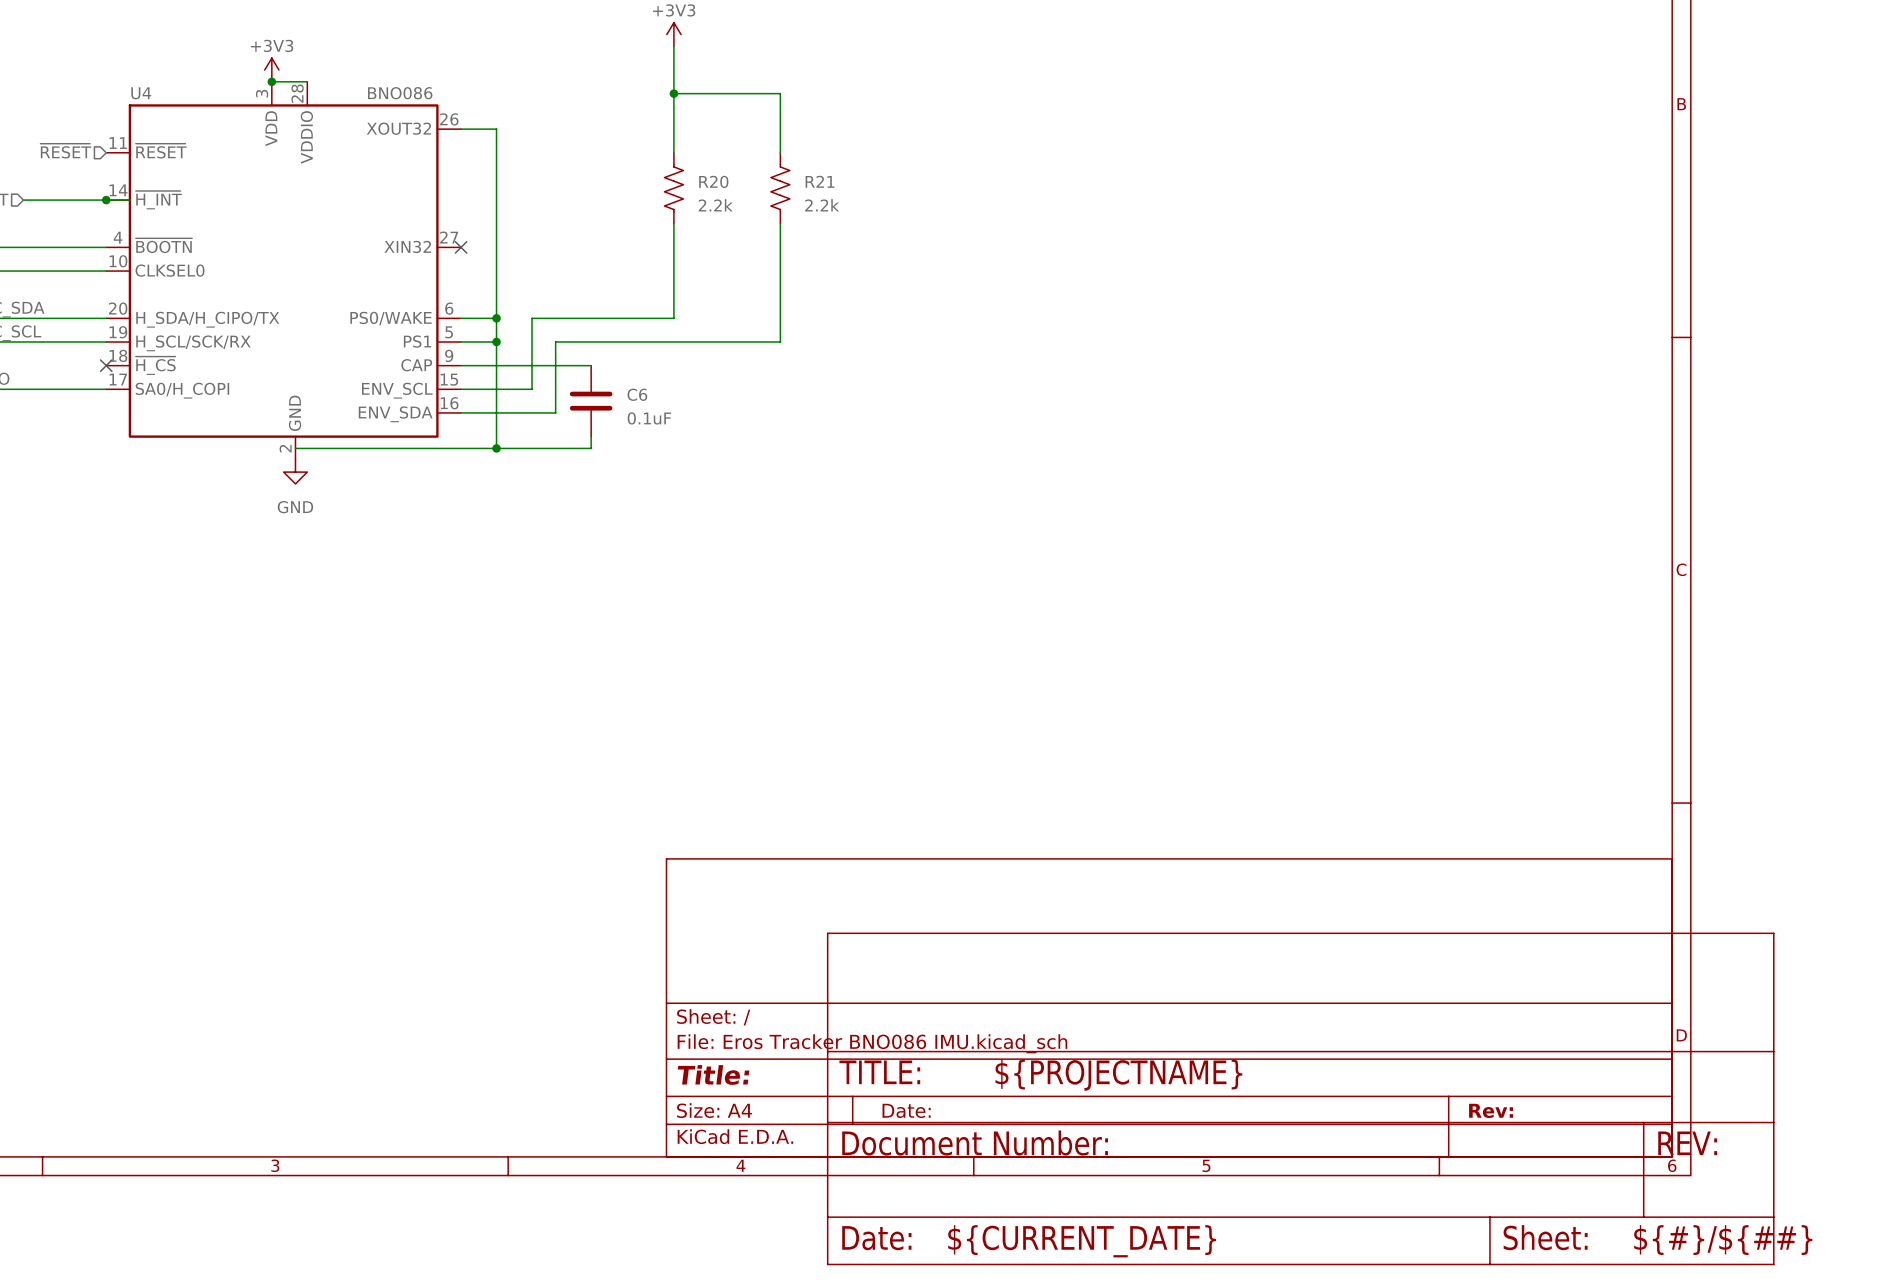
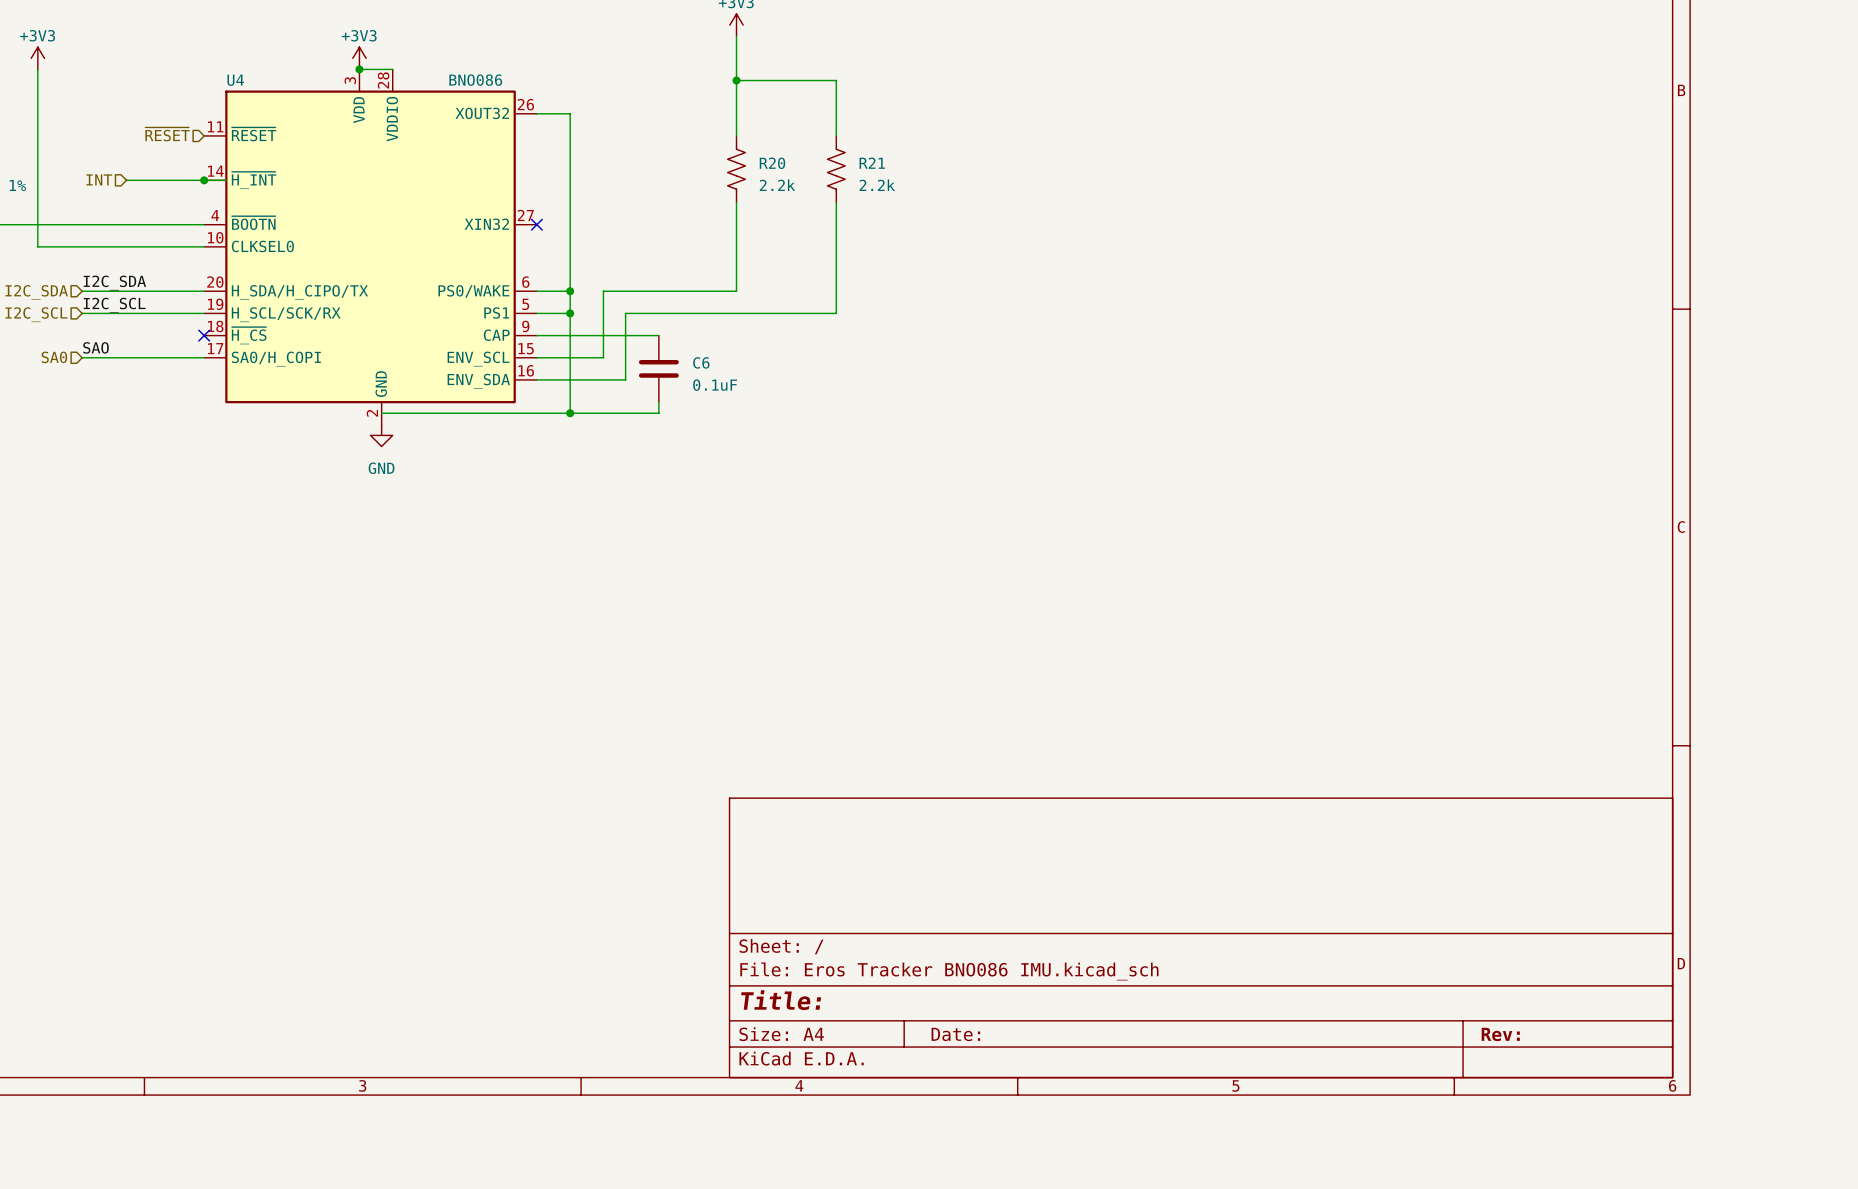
power symbol: (1300, 1098) -> none

